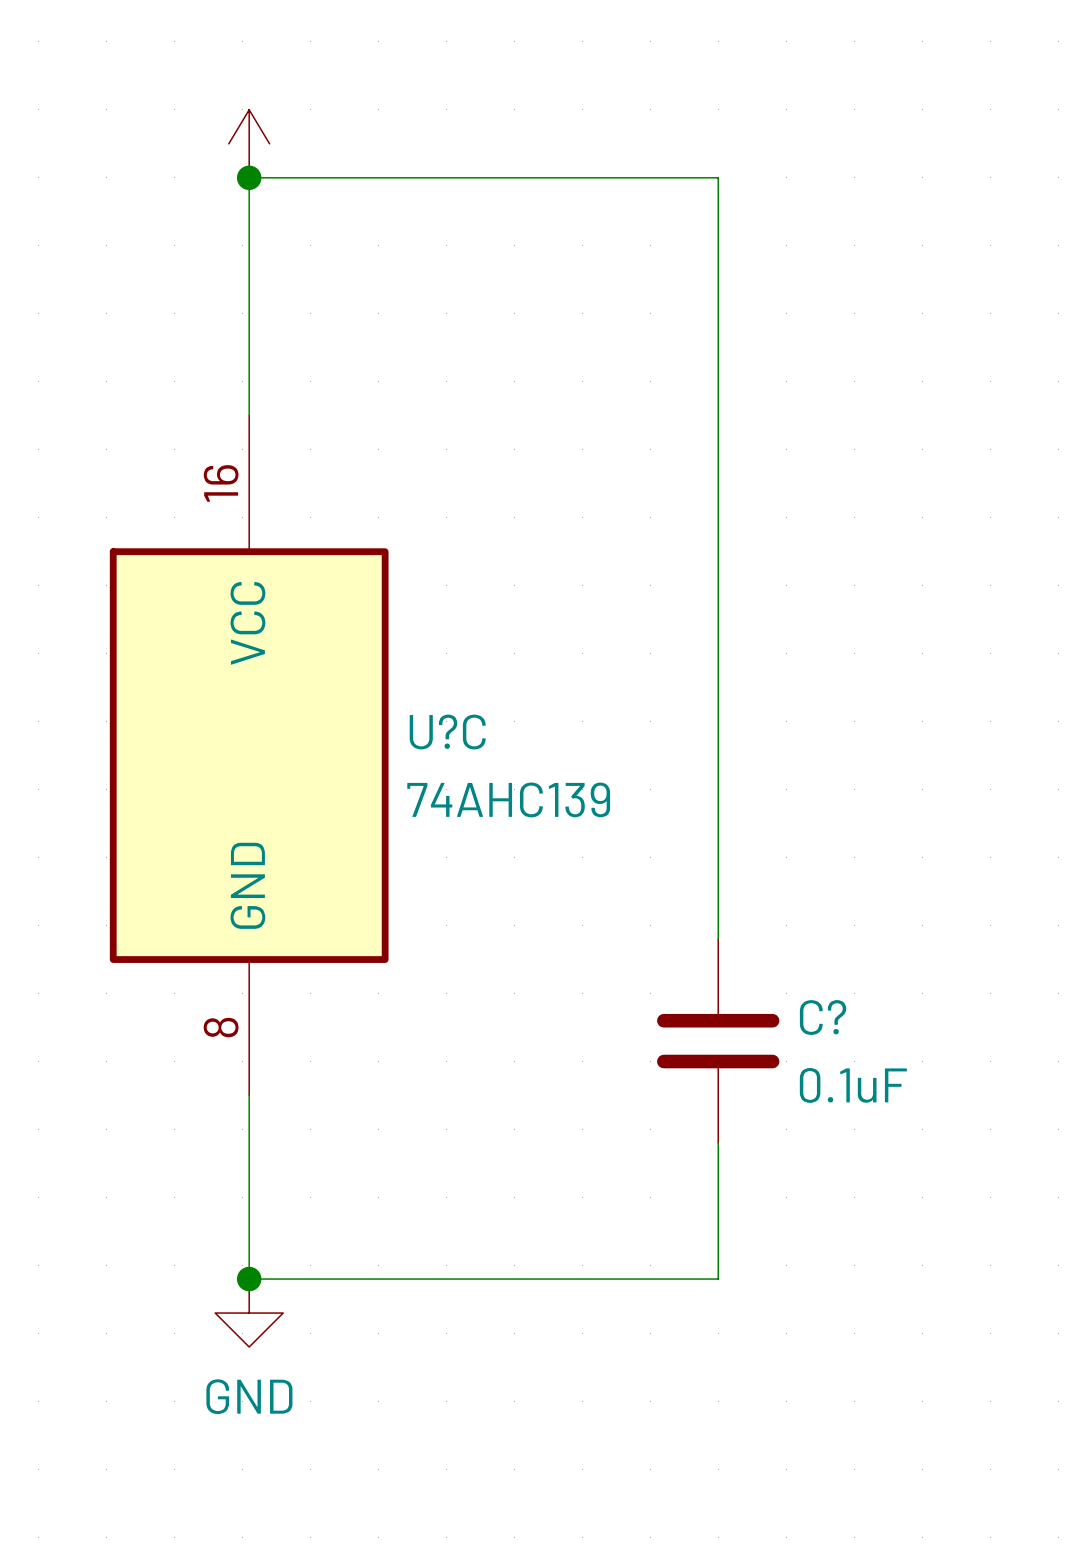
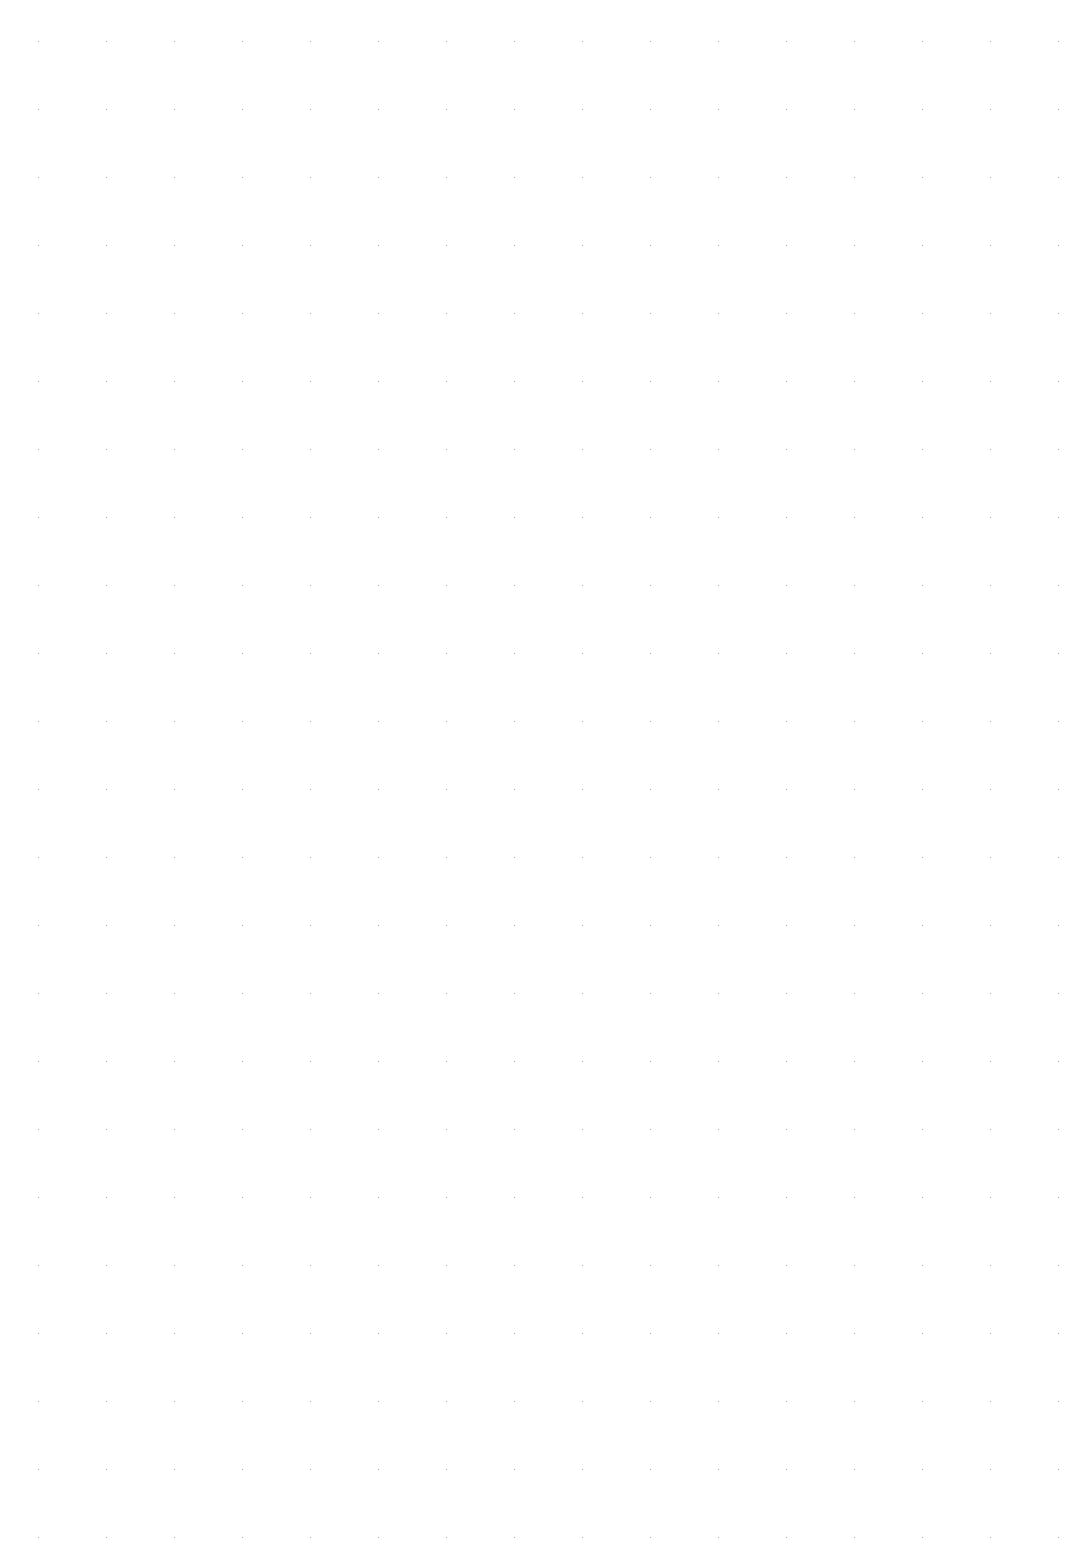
power symbol: (249, 143) -> none
junction: (249, 177) -> none
wire: (249, 415) (249, 177) (718, 177) (718, 939) -> none
U?C: 74AHC139 (249, 755) -> none
C?: 0.1uF (718, 1041) -> none
wire: (249, 1095) (249, 1279) (718, 1279) (718, 1143) -> none
junction: (249, 1279) -> none
power symbol: GND (249, 1313) -> none

